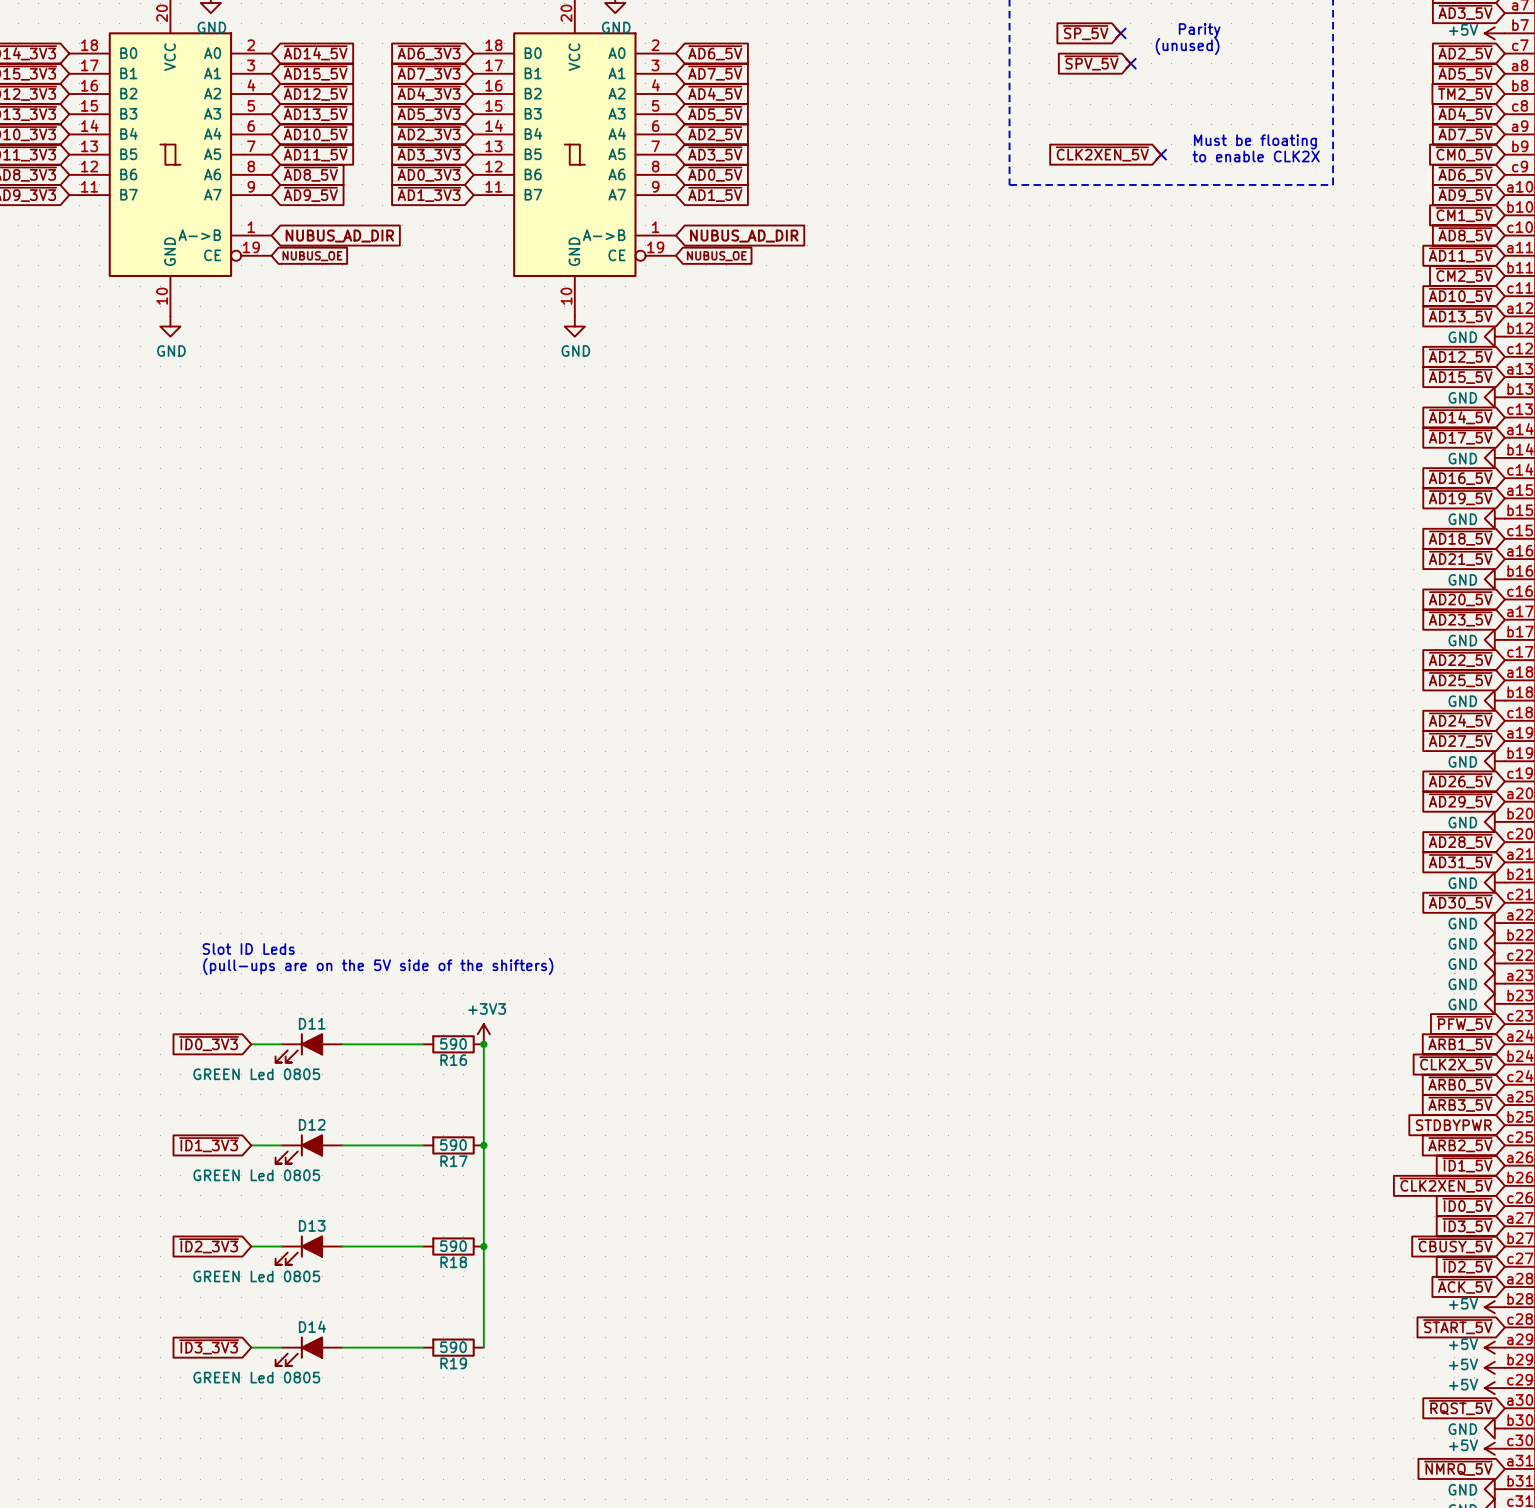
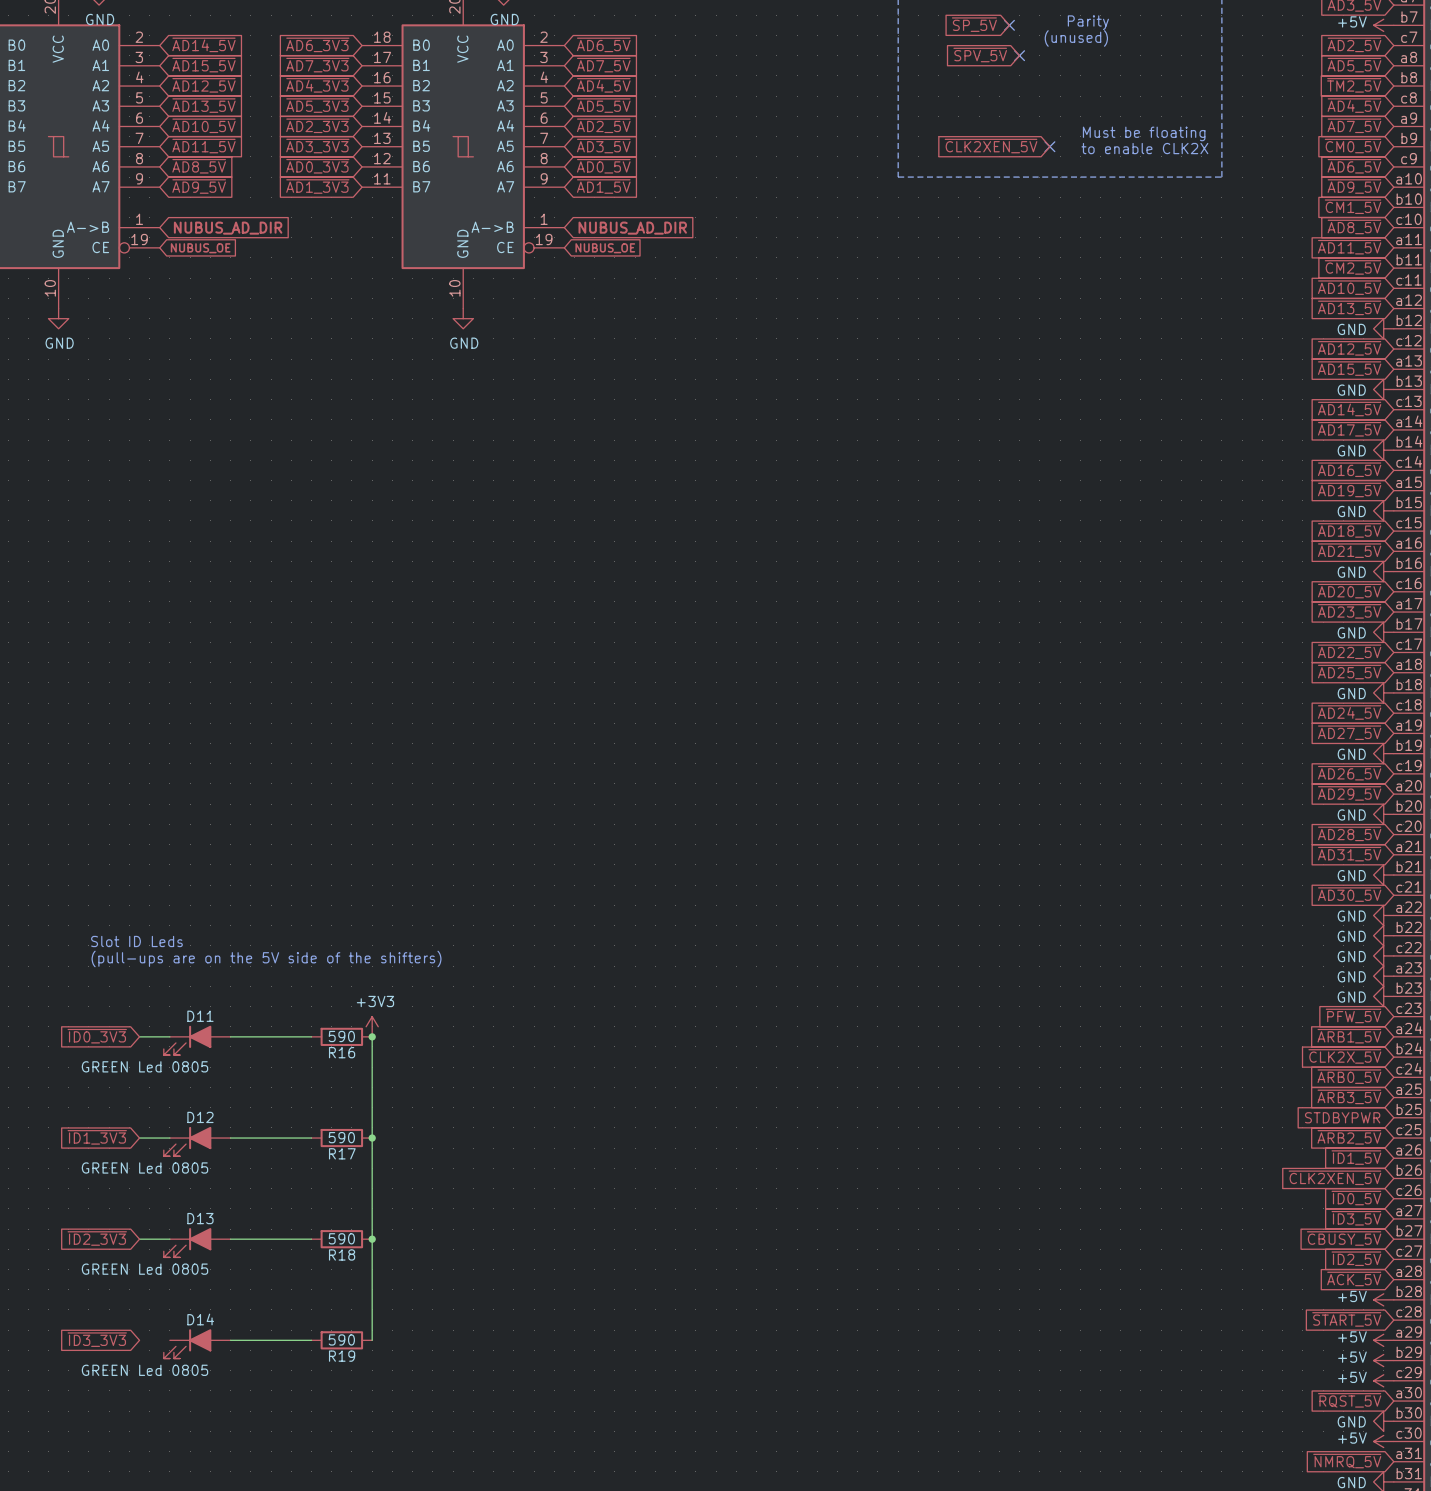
wire: (251, 1347) (281, 1347) -> none

